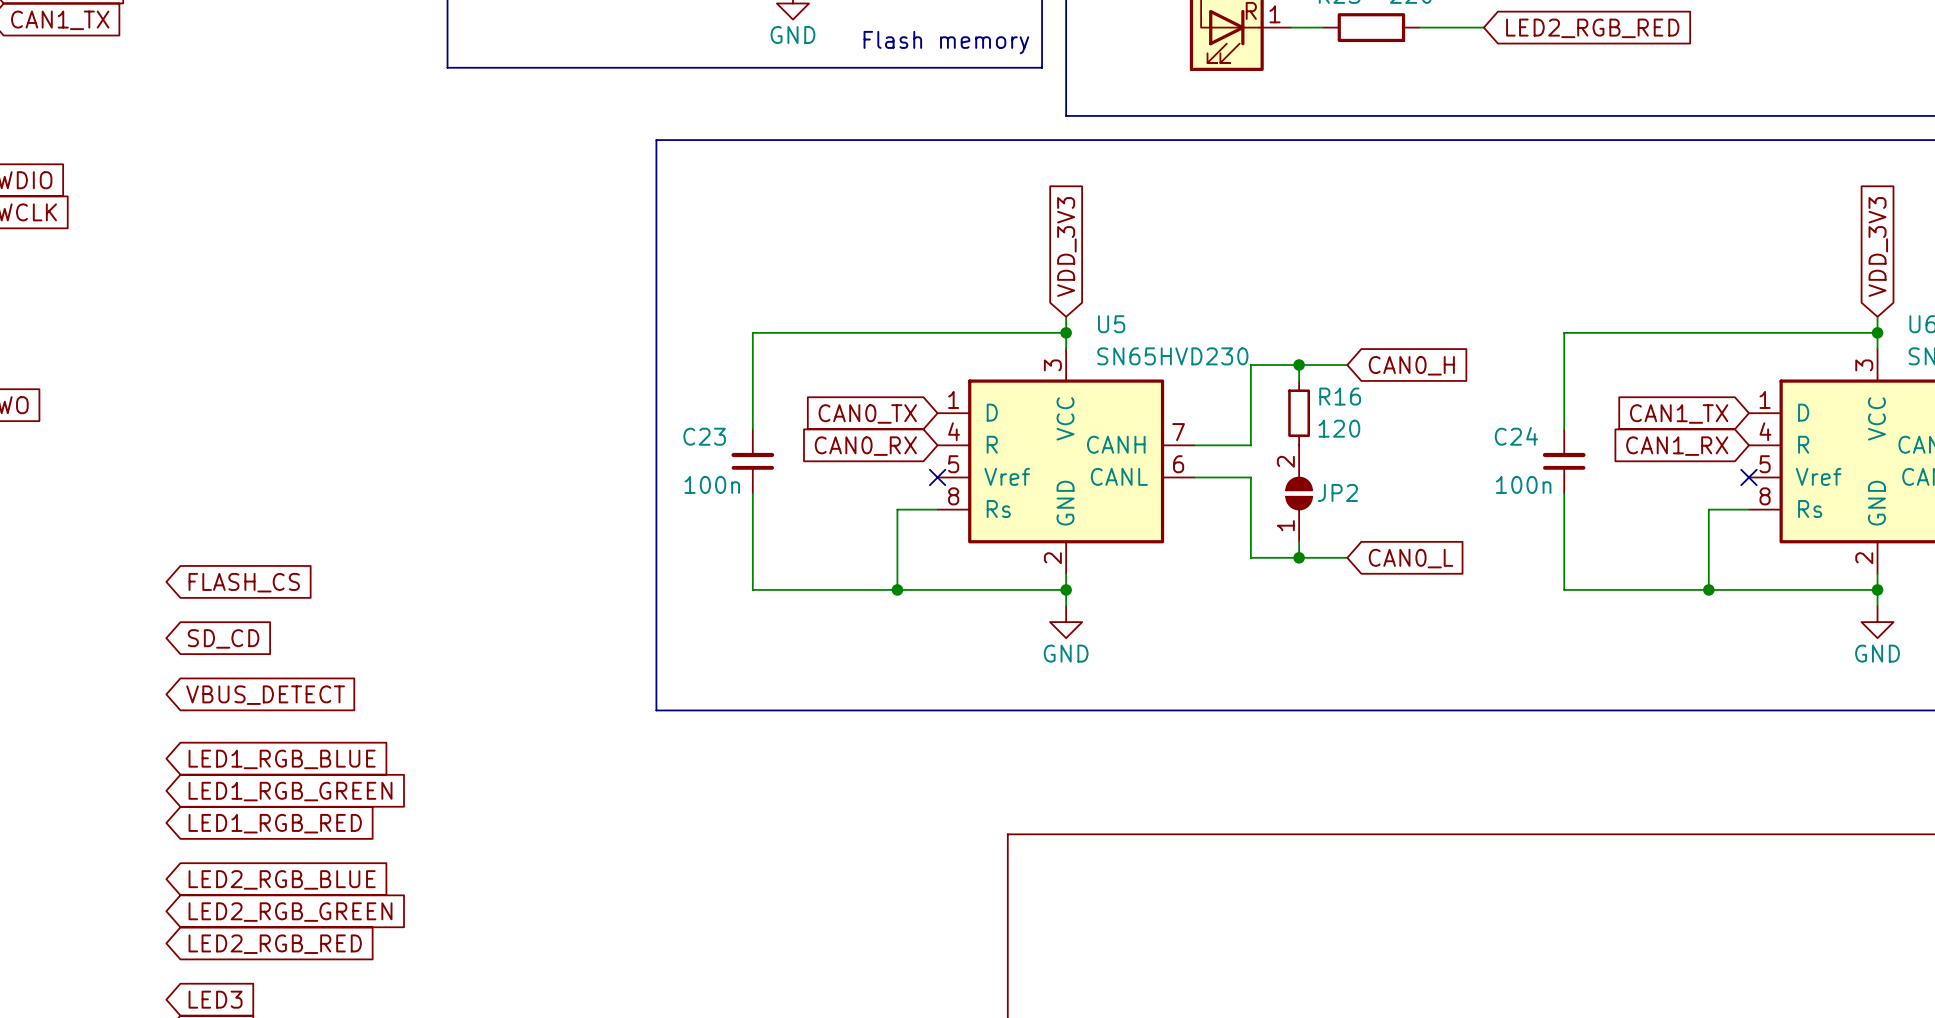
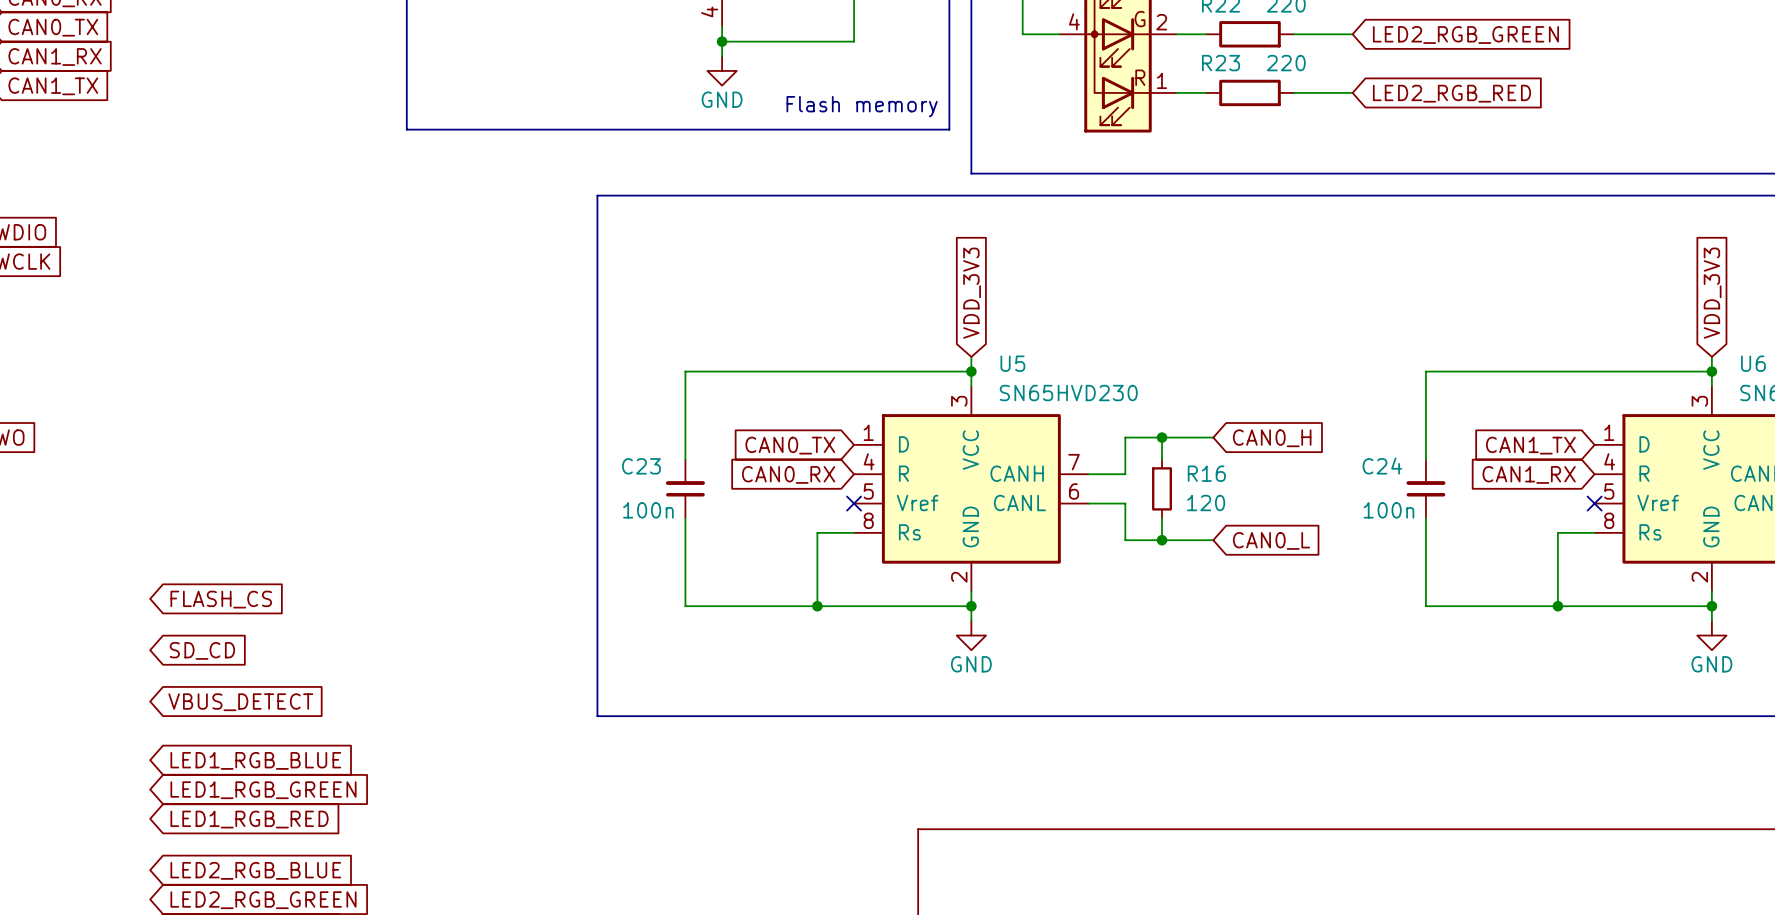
wire: (1299, 365) (1299, 381) -> none
junction position: (1299, 365) -> (1162, 437)
wire: (1347, 365) (1250, 365) (1250, 445) (1234, 445) -> (1213, 437) (1125, 437) (1125, 474)
global label position: CAN0_H (1411, 365) -> CAN0_H (1272, 438)
R16 name position: R16 (1340, 396) -> R16 (1206, 473)
wire: none -> (1162, 437) (1162, 459)
R16 position: (1299, 413) -> (1162, 488)
R16 value position: 120 (1339, 428) -> 120 (1206, 503)
wire: (1234, 477) (1250, 477) (1250, 557) (1347, 557) -> (1125, 503) (1125, 540) (1213, 540)
wire: none -> (1162, 518) (1162, 540)
JP2: (1299, 493) -> none
wire: (1299, 541) (1299, 557) -> none
junction position: (1299, 557) -> (1162, 540)
global label position: CAN0_L (1411, 558) -> CAN0_L (1271, 540)

